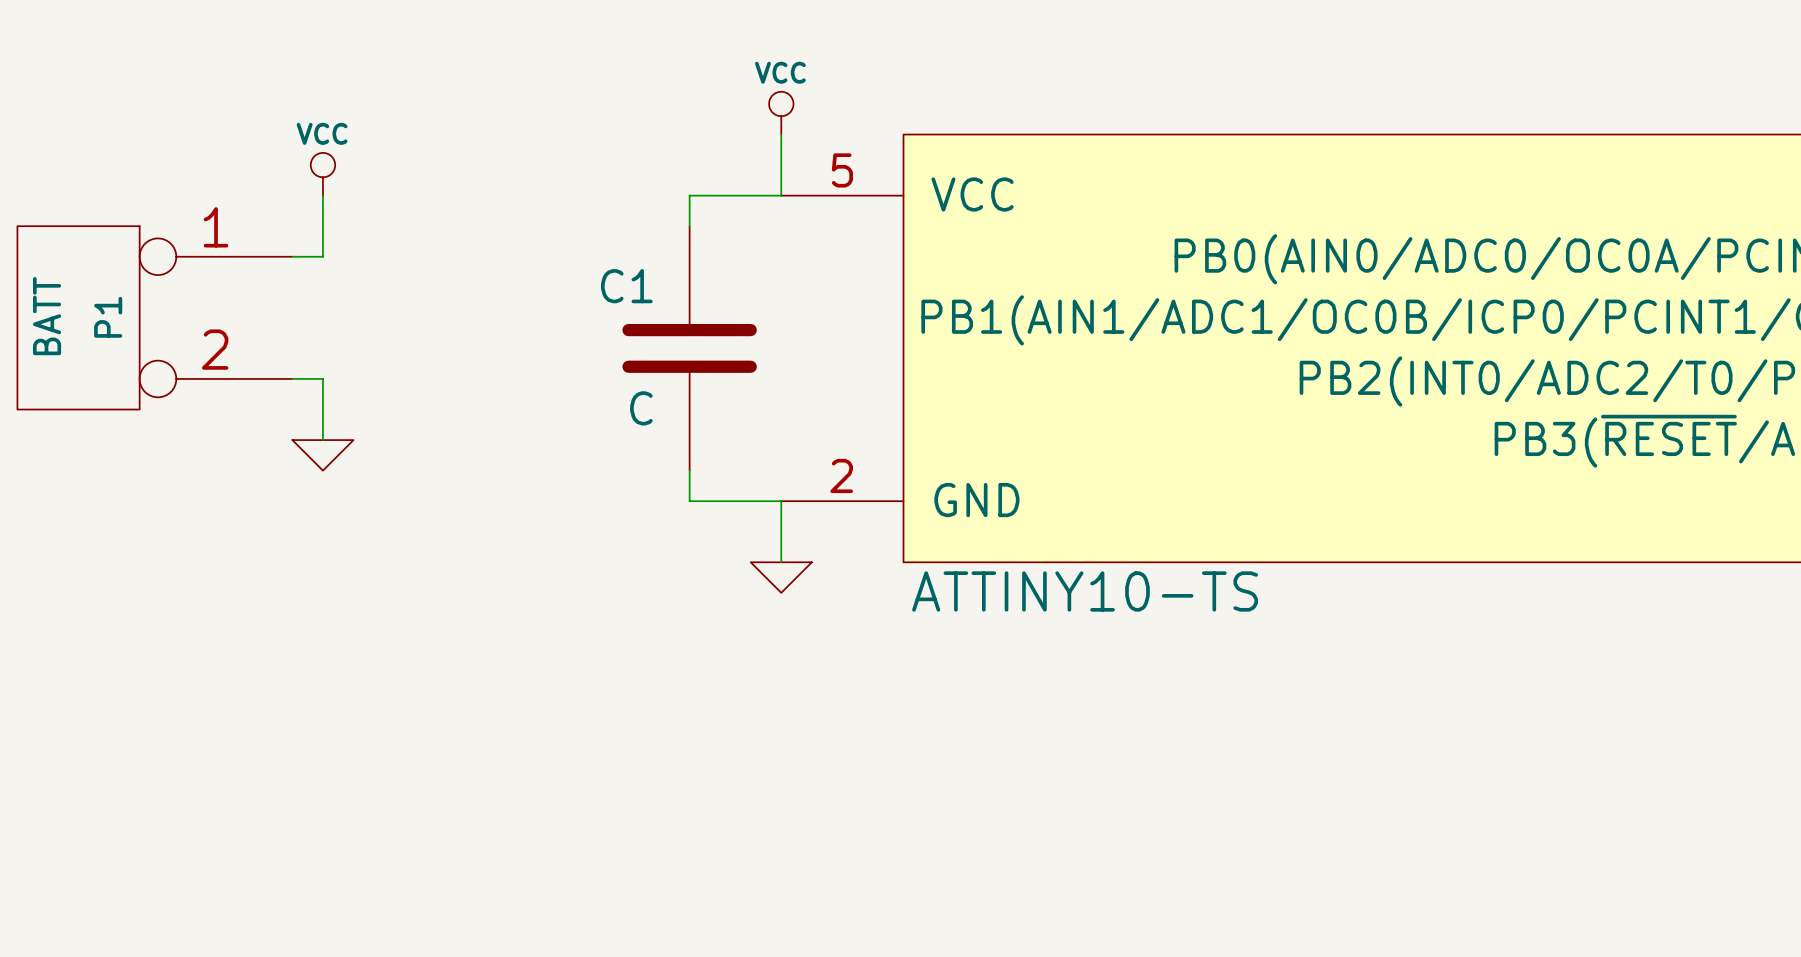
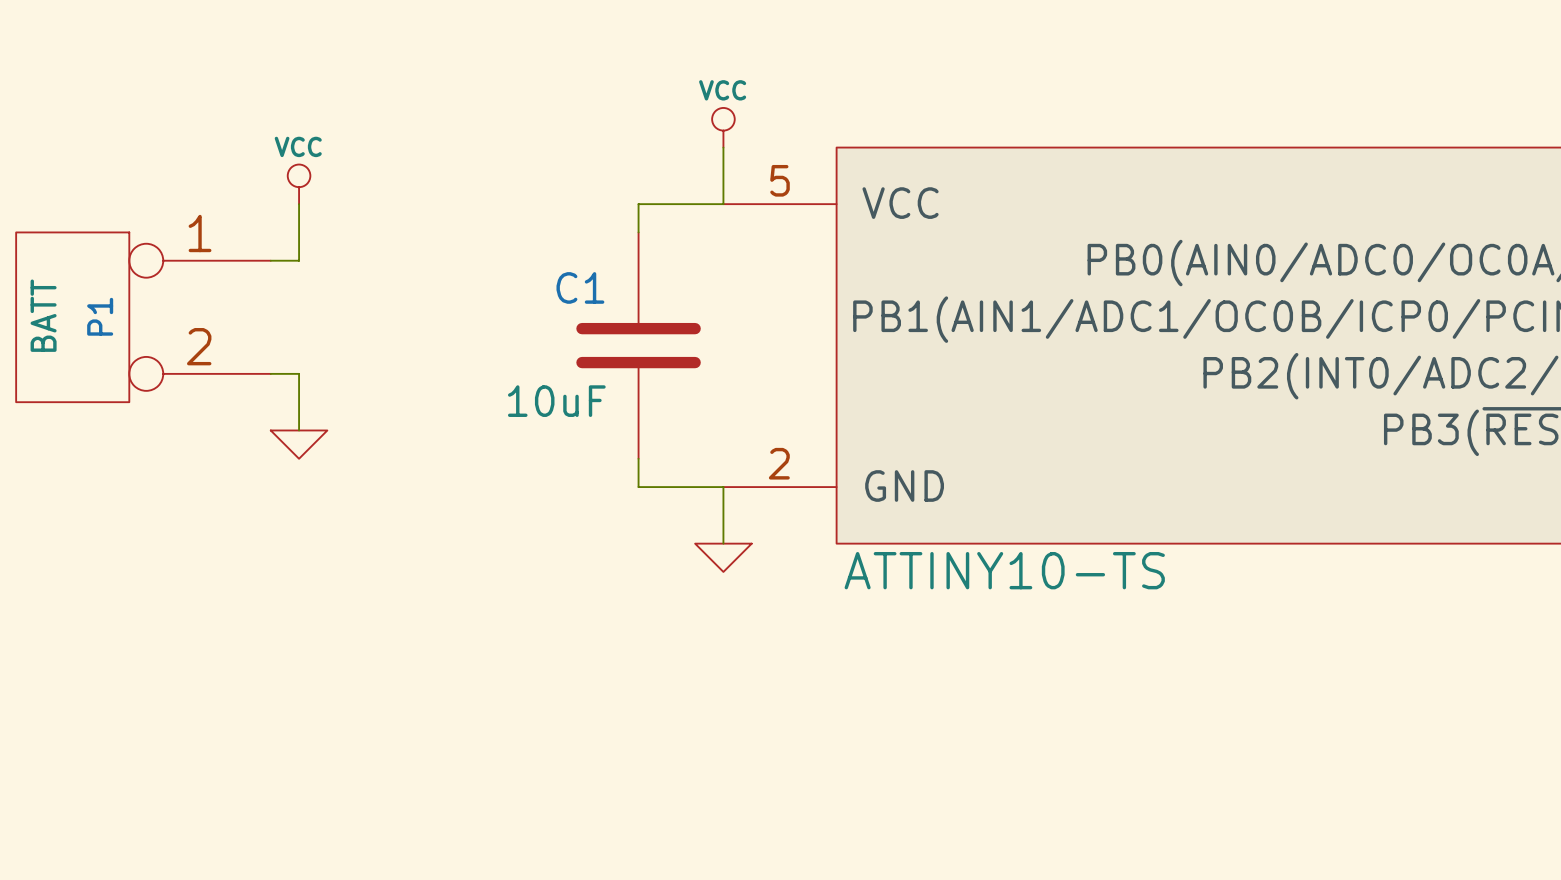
C1 value: C (641, 408) -> 10uF (556, 401)

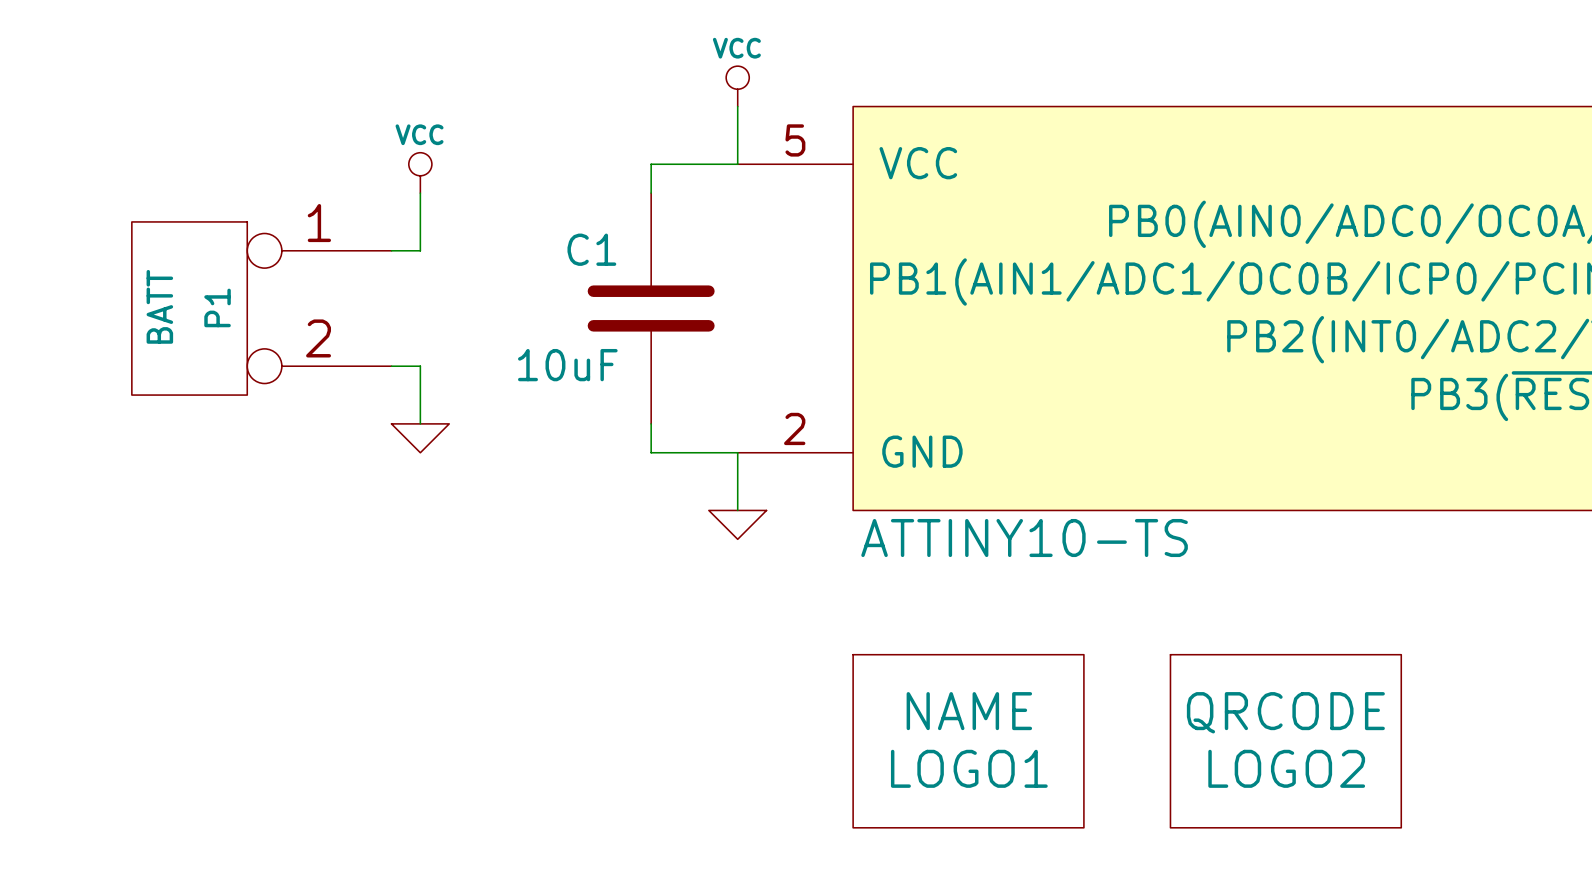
power symbol position: VCC (299, 184) -> VCC (420, 172)
wire: (299, 204) (299, 260) (270, 260) -> (420, 193) (420, 250) (391, 250)
P1 position: (143, 317) -> (261, 308)
wire: (270, 373) (299, 373) (299, 430) -> (391, 366) (420, 366) (420, 423)
power symbol position: (299, 444) -> (420, 438)
LOGO1: none -> NAME (968, 741)
LOGO2: none -> QRCODE (1285, 741)

